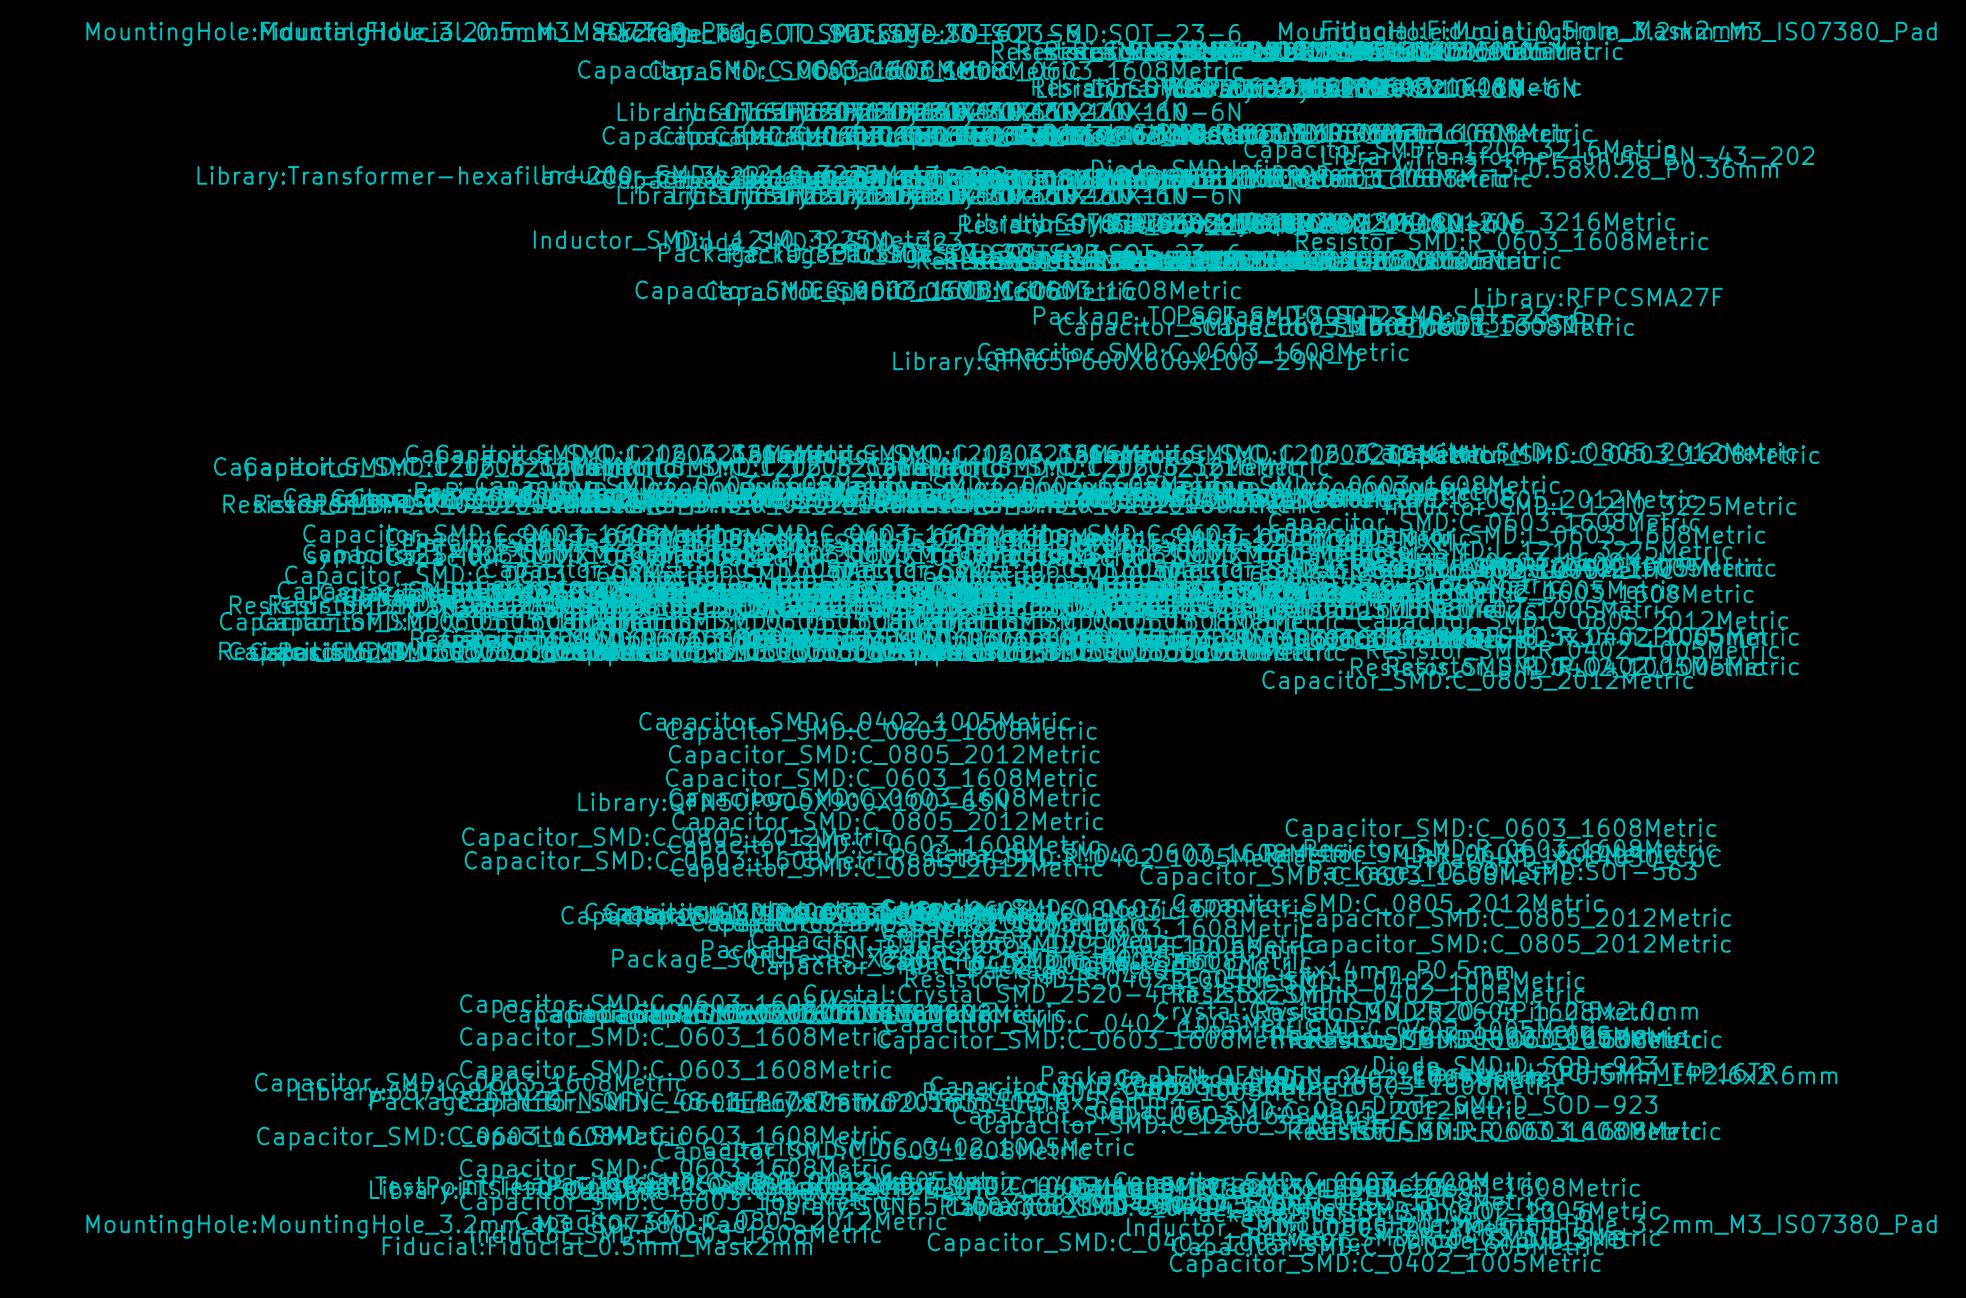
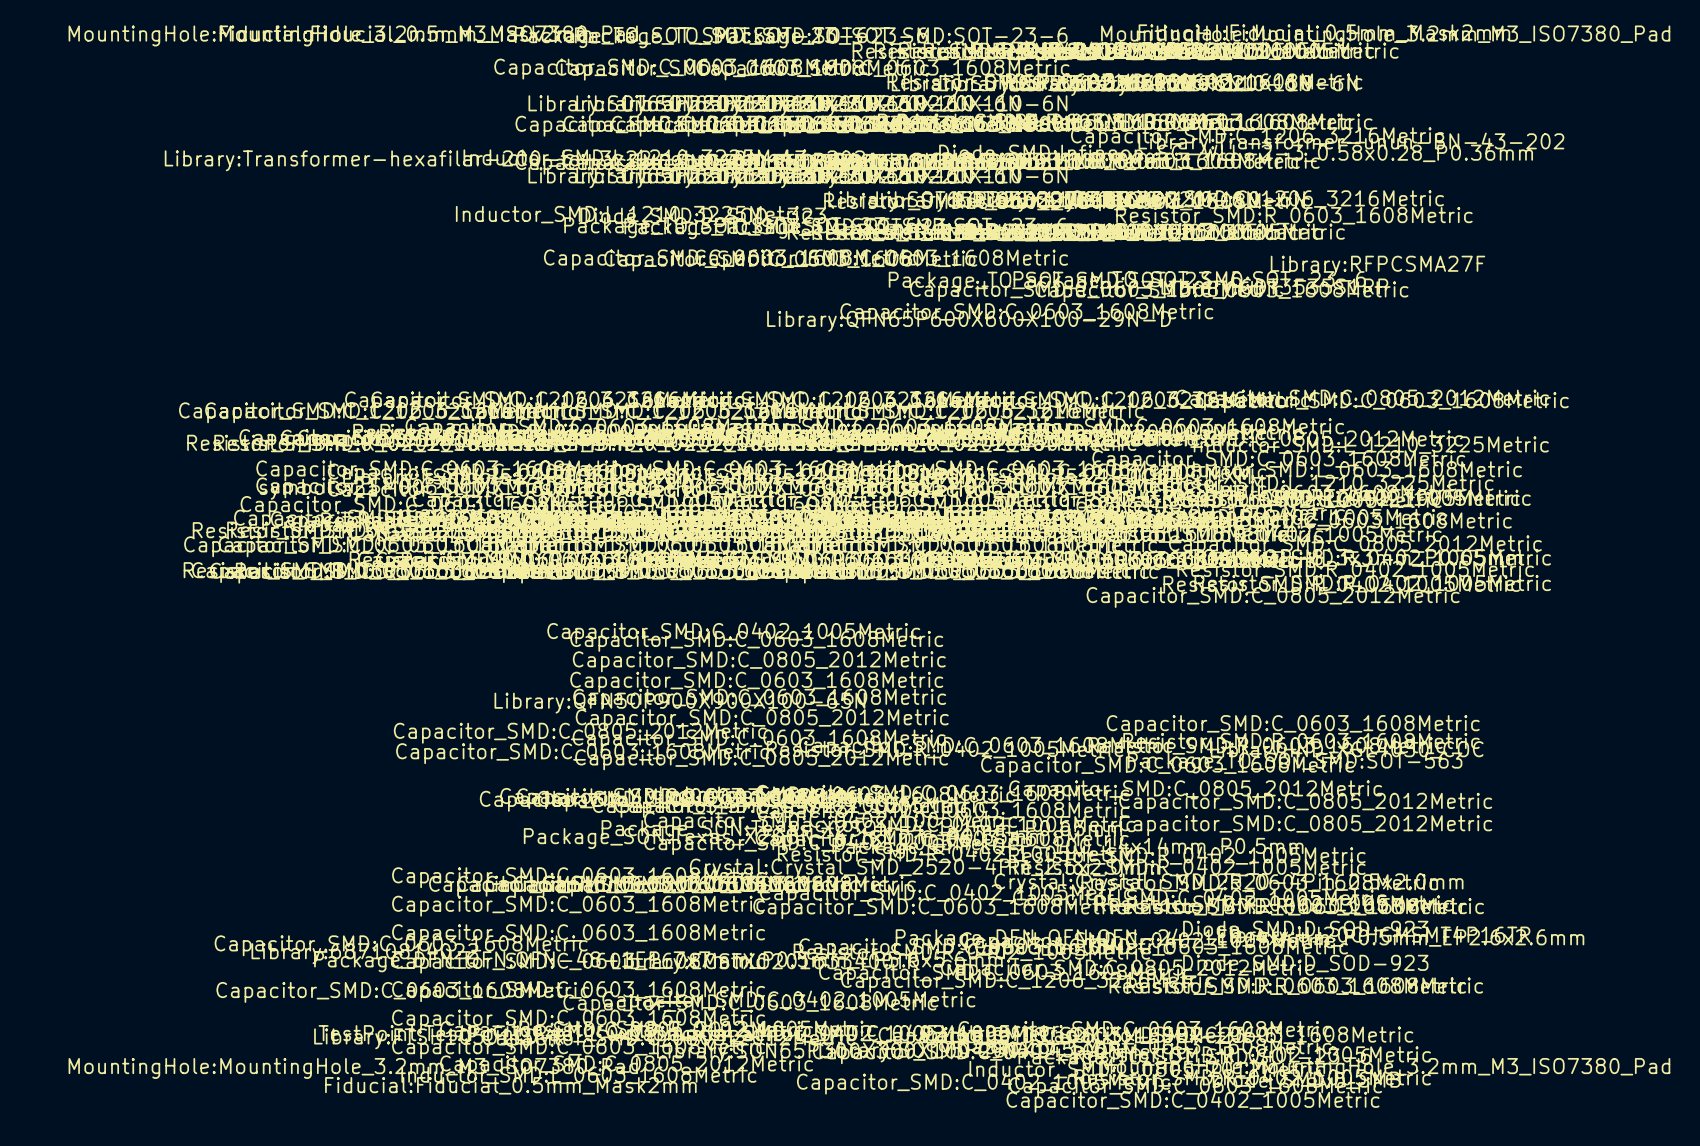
line: none -> (690, 1002) (656, 1002) (651, 1008)

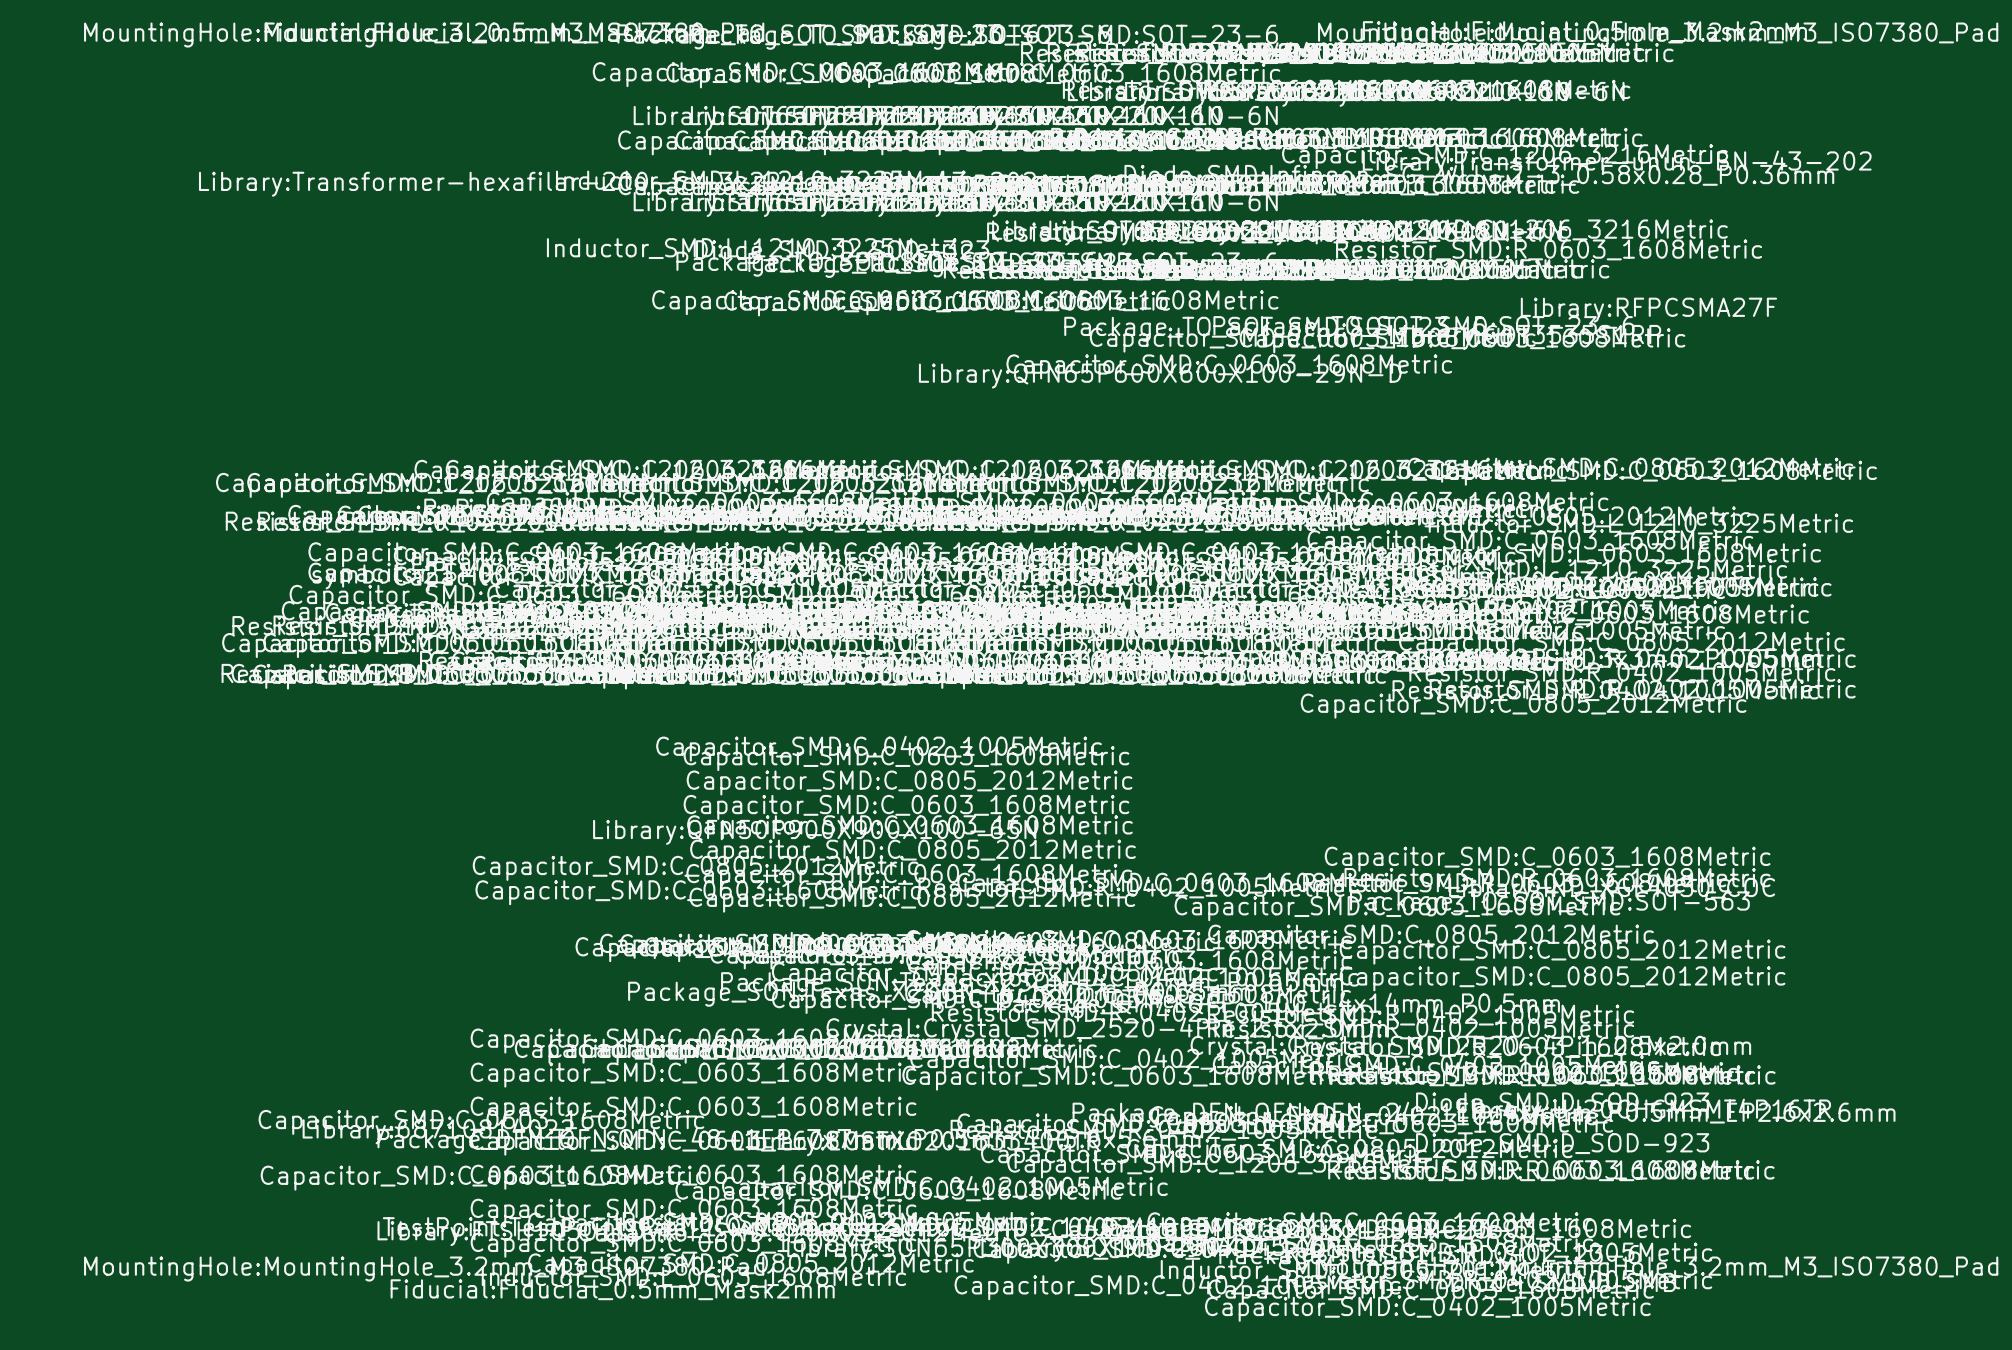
line: (690, 1002) (656, 1002) (651, 1008) -> none

